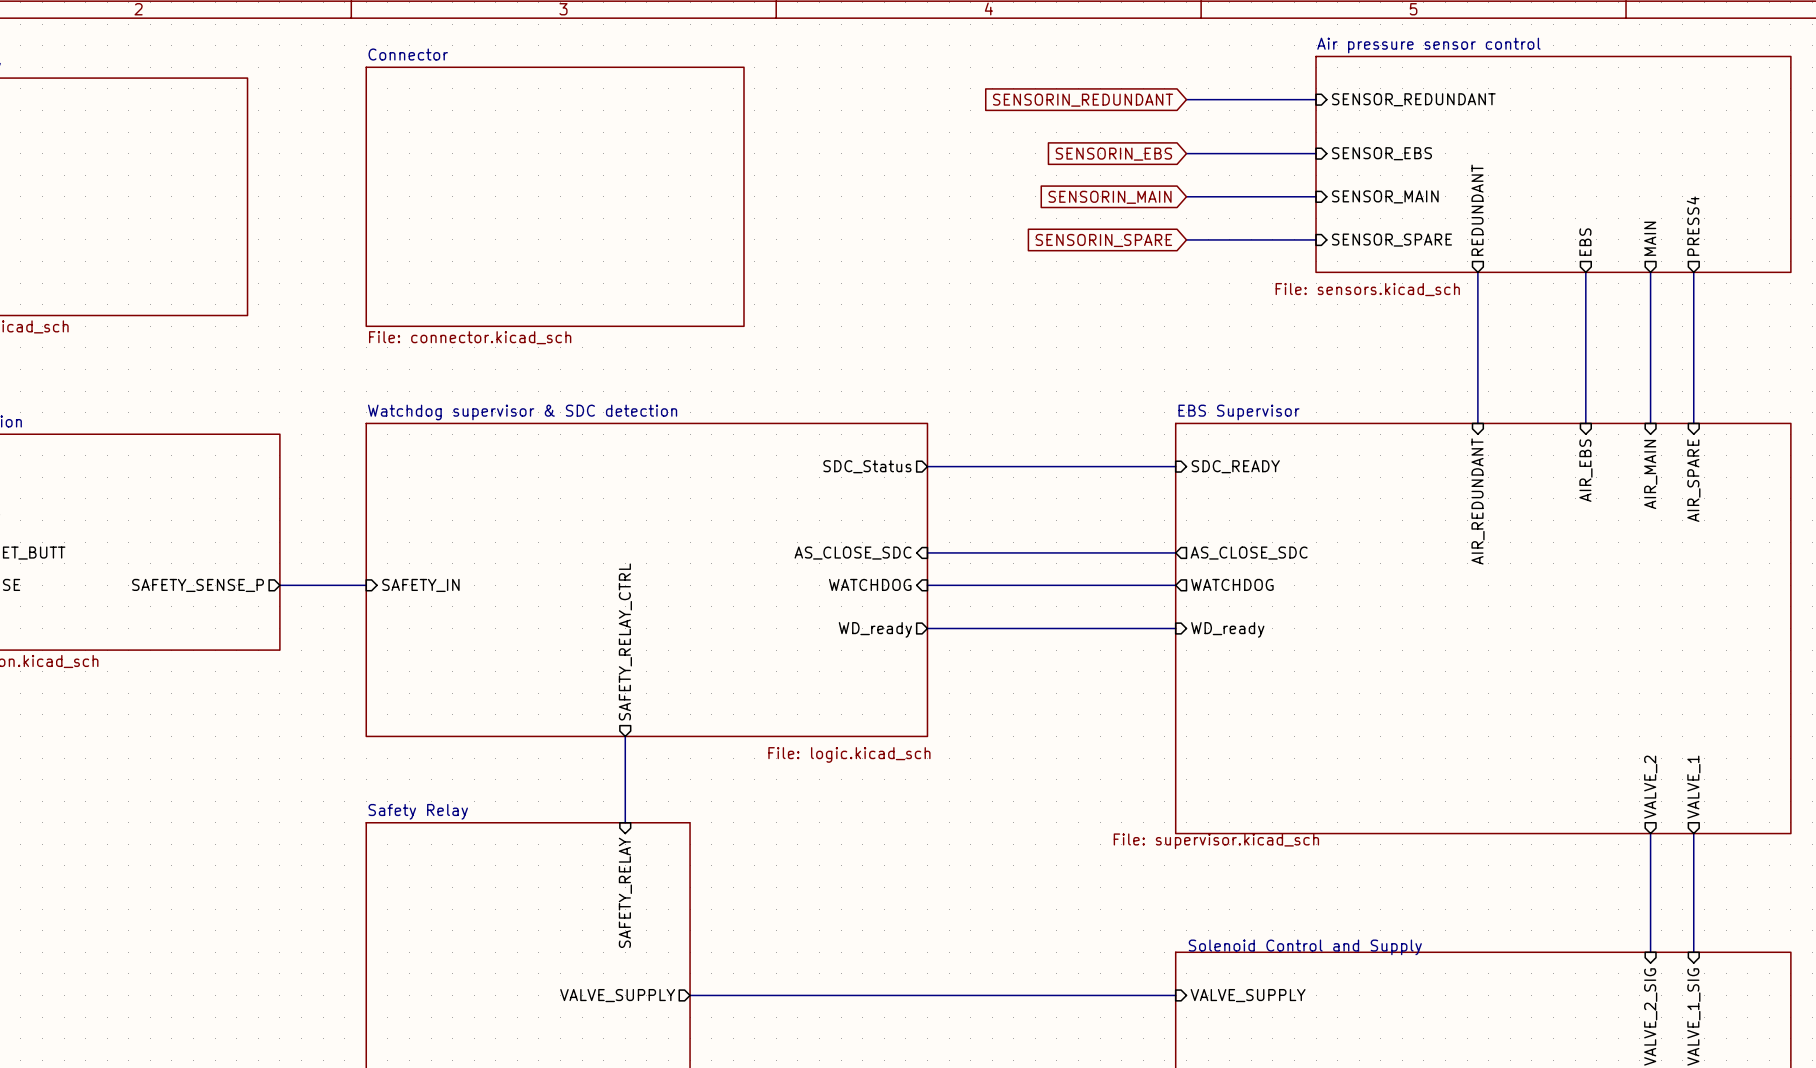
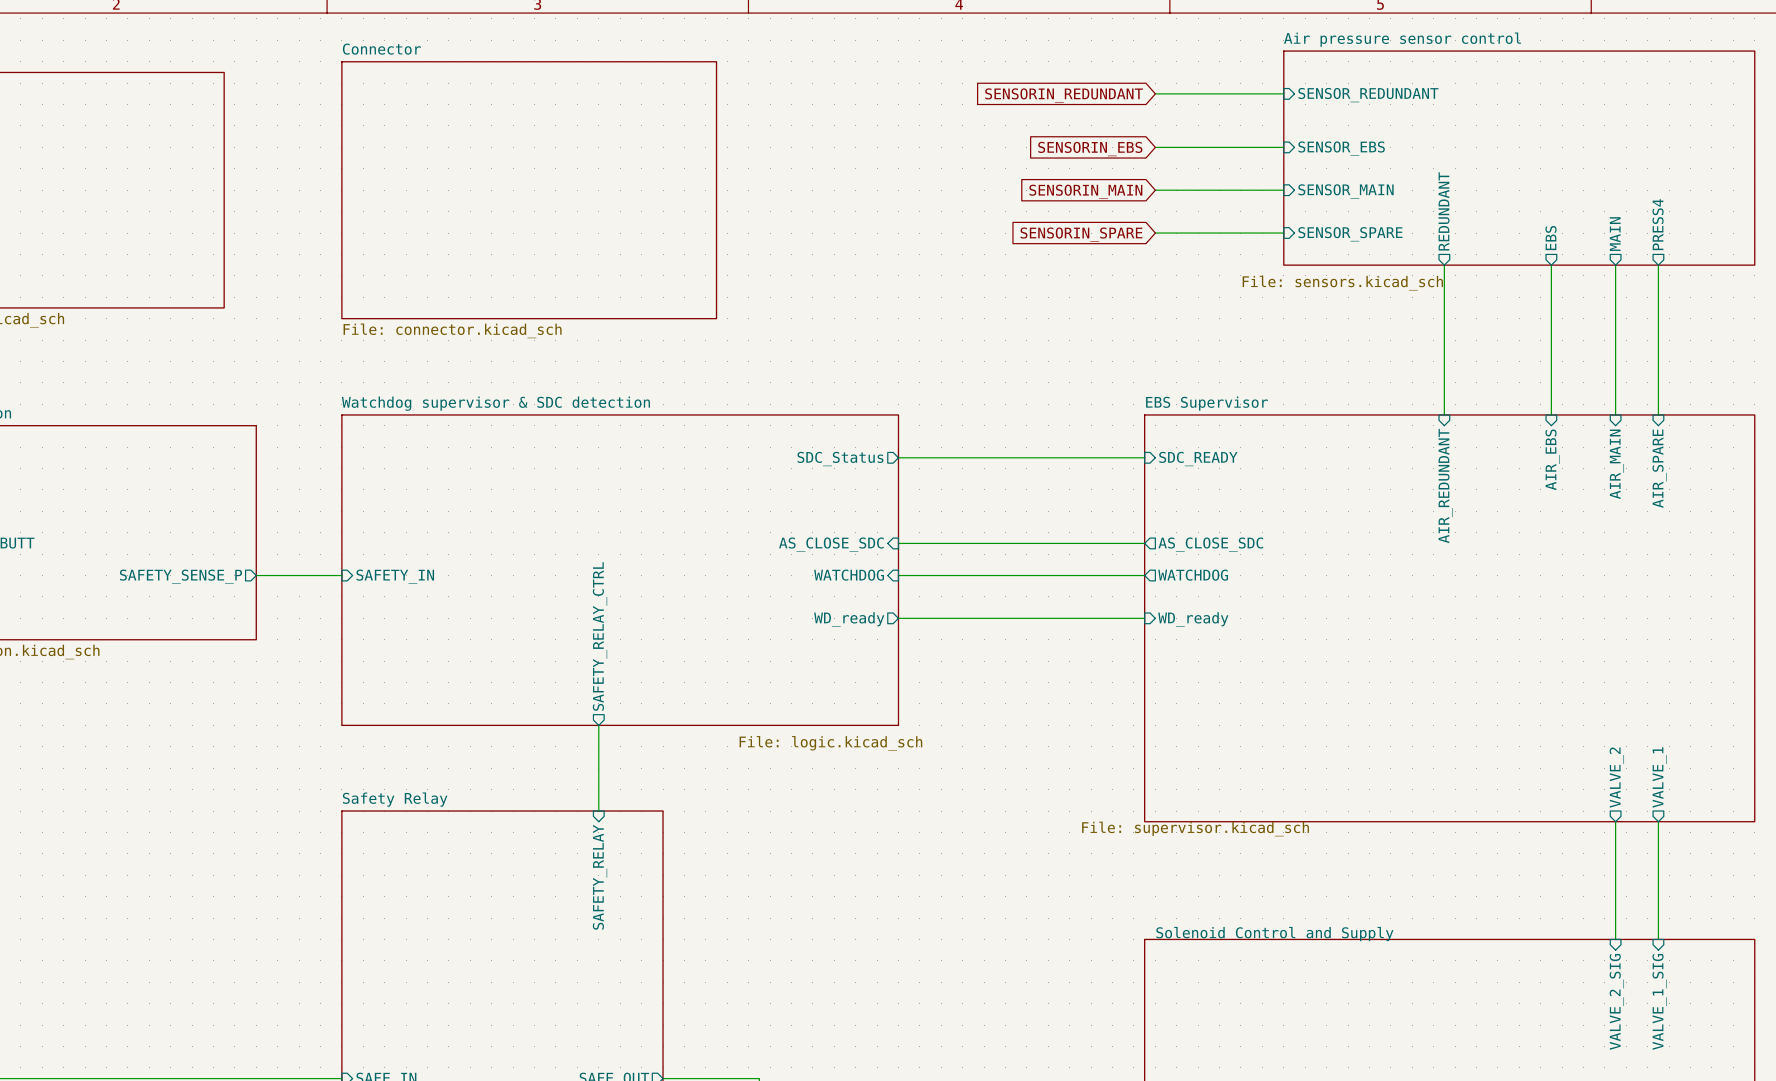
sheet pin: VALVE_SUPPLY (617, 995) -> none
wire: (690, 995) (1175, 995) -> none
sheet pin: VALVE_SUPPLY (1248, 995) -> none

